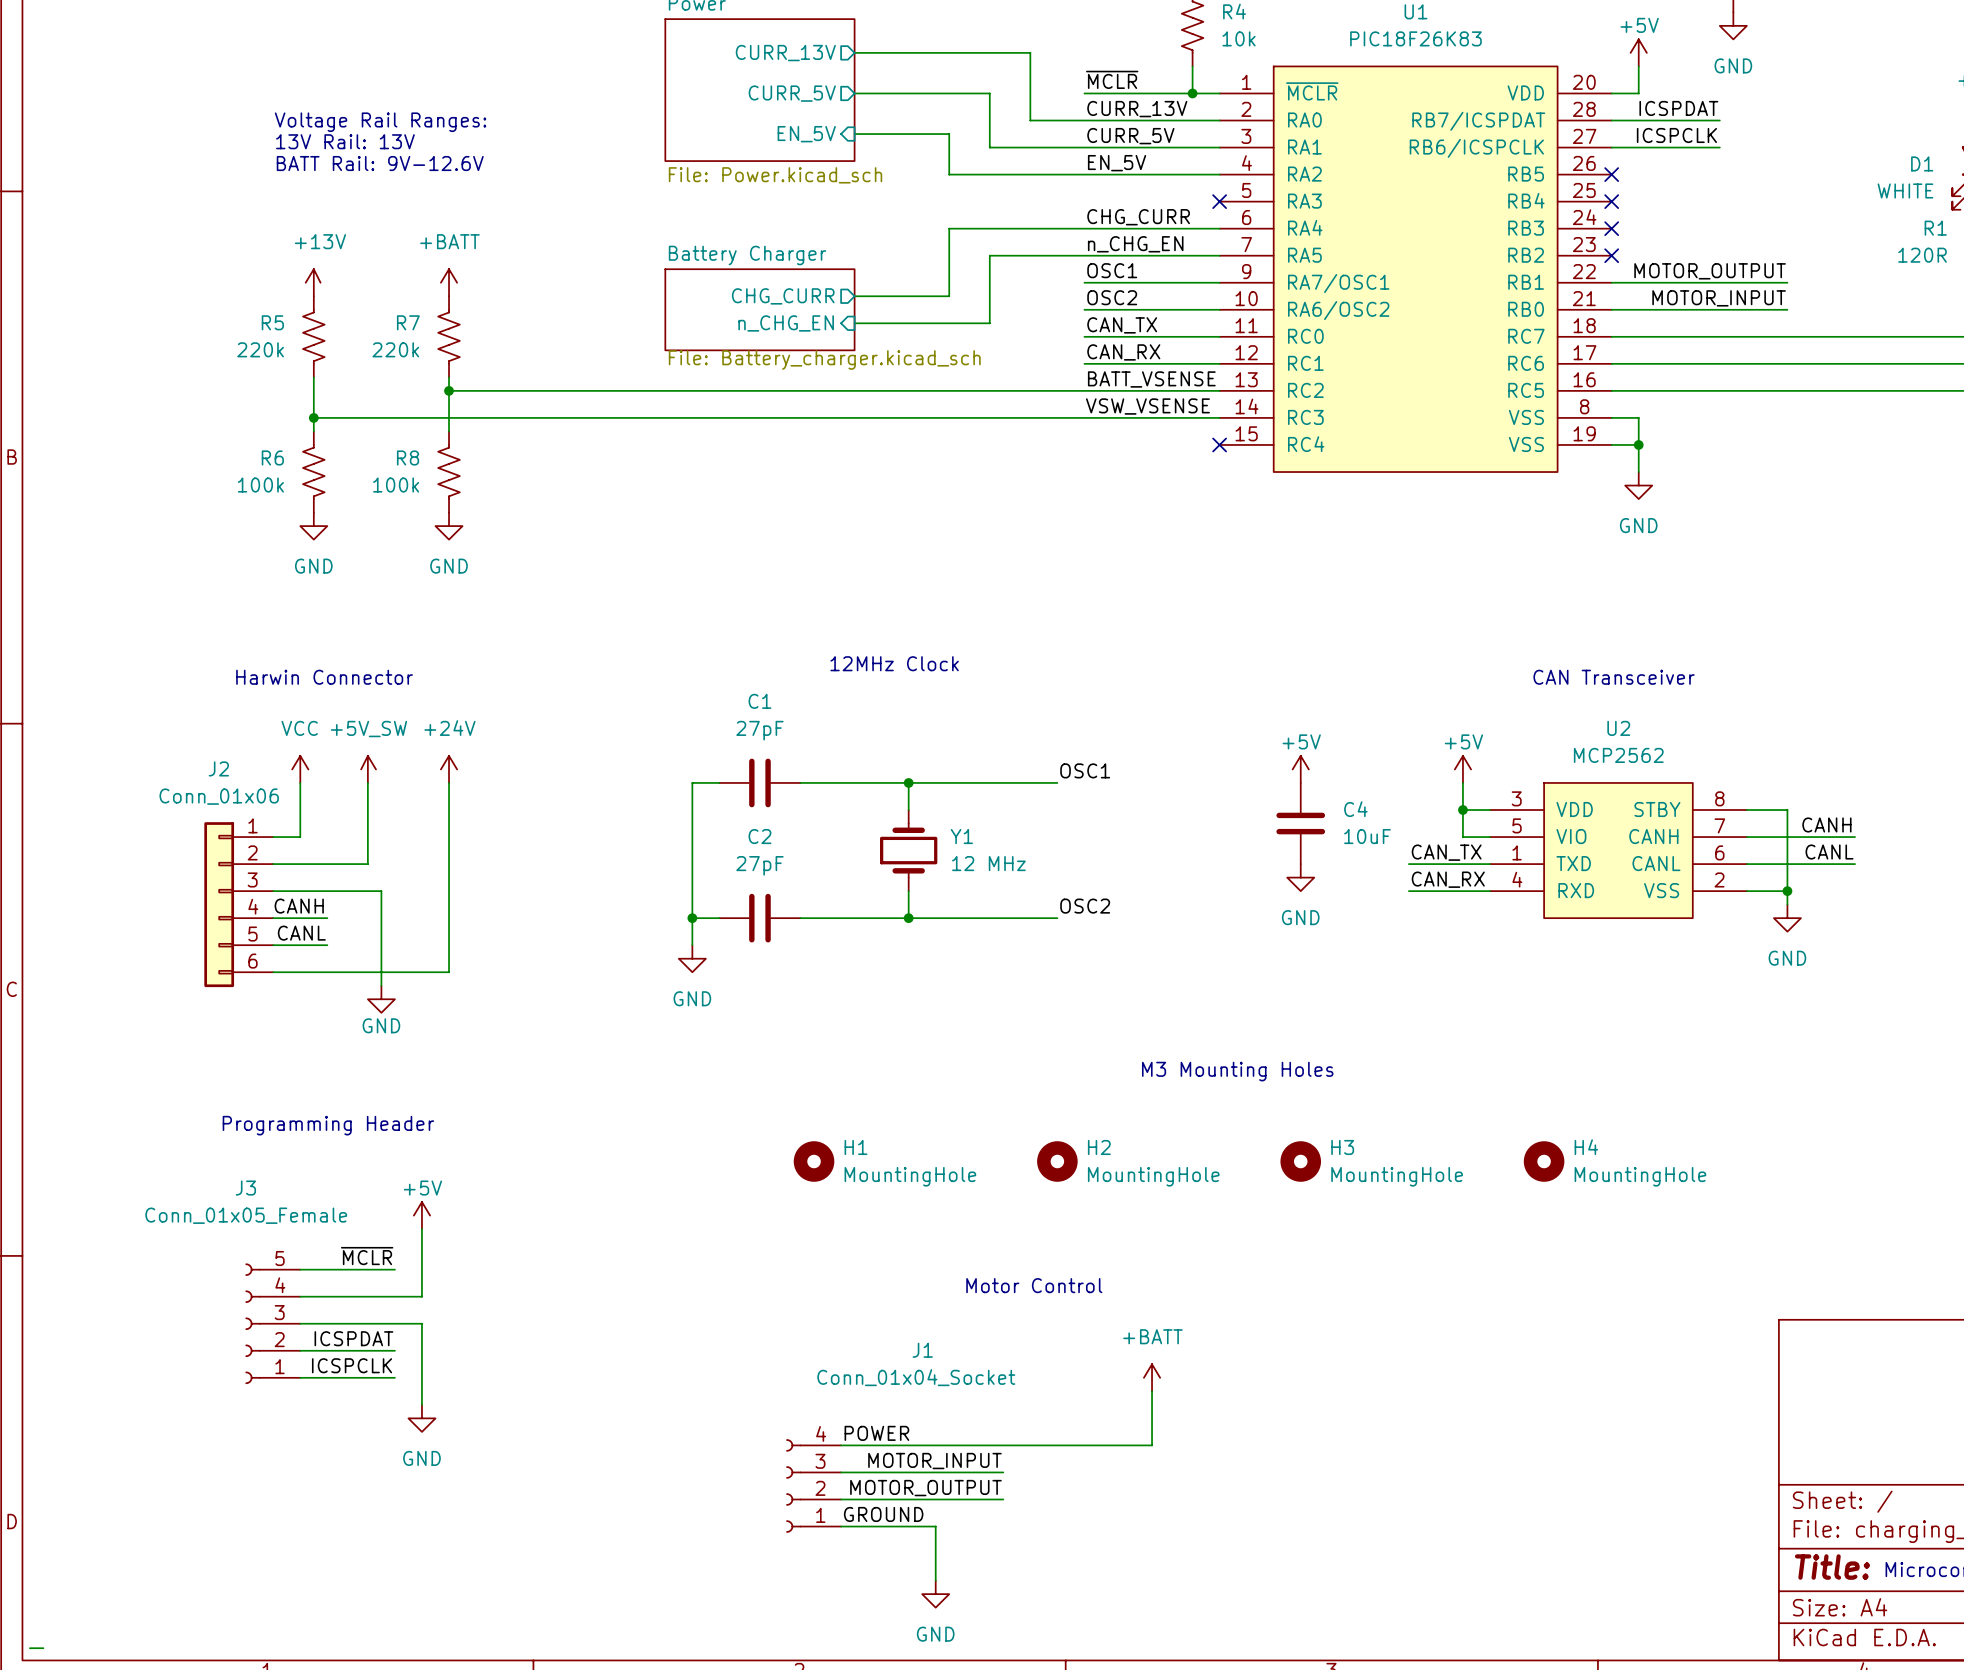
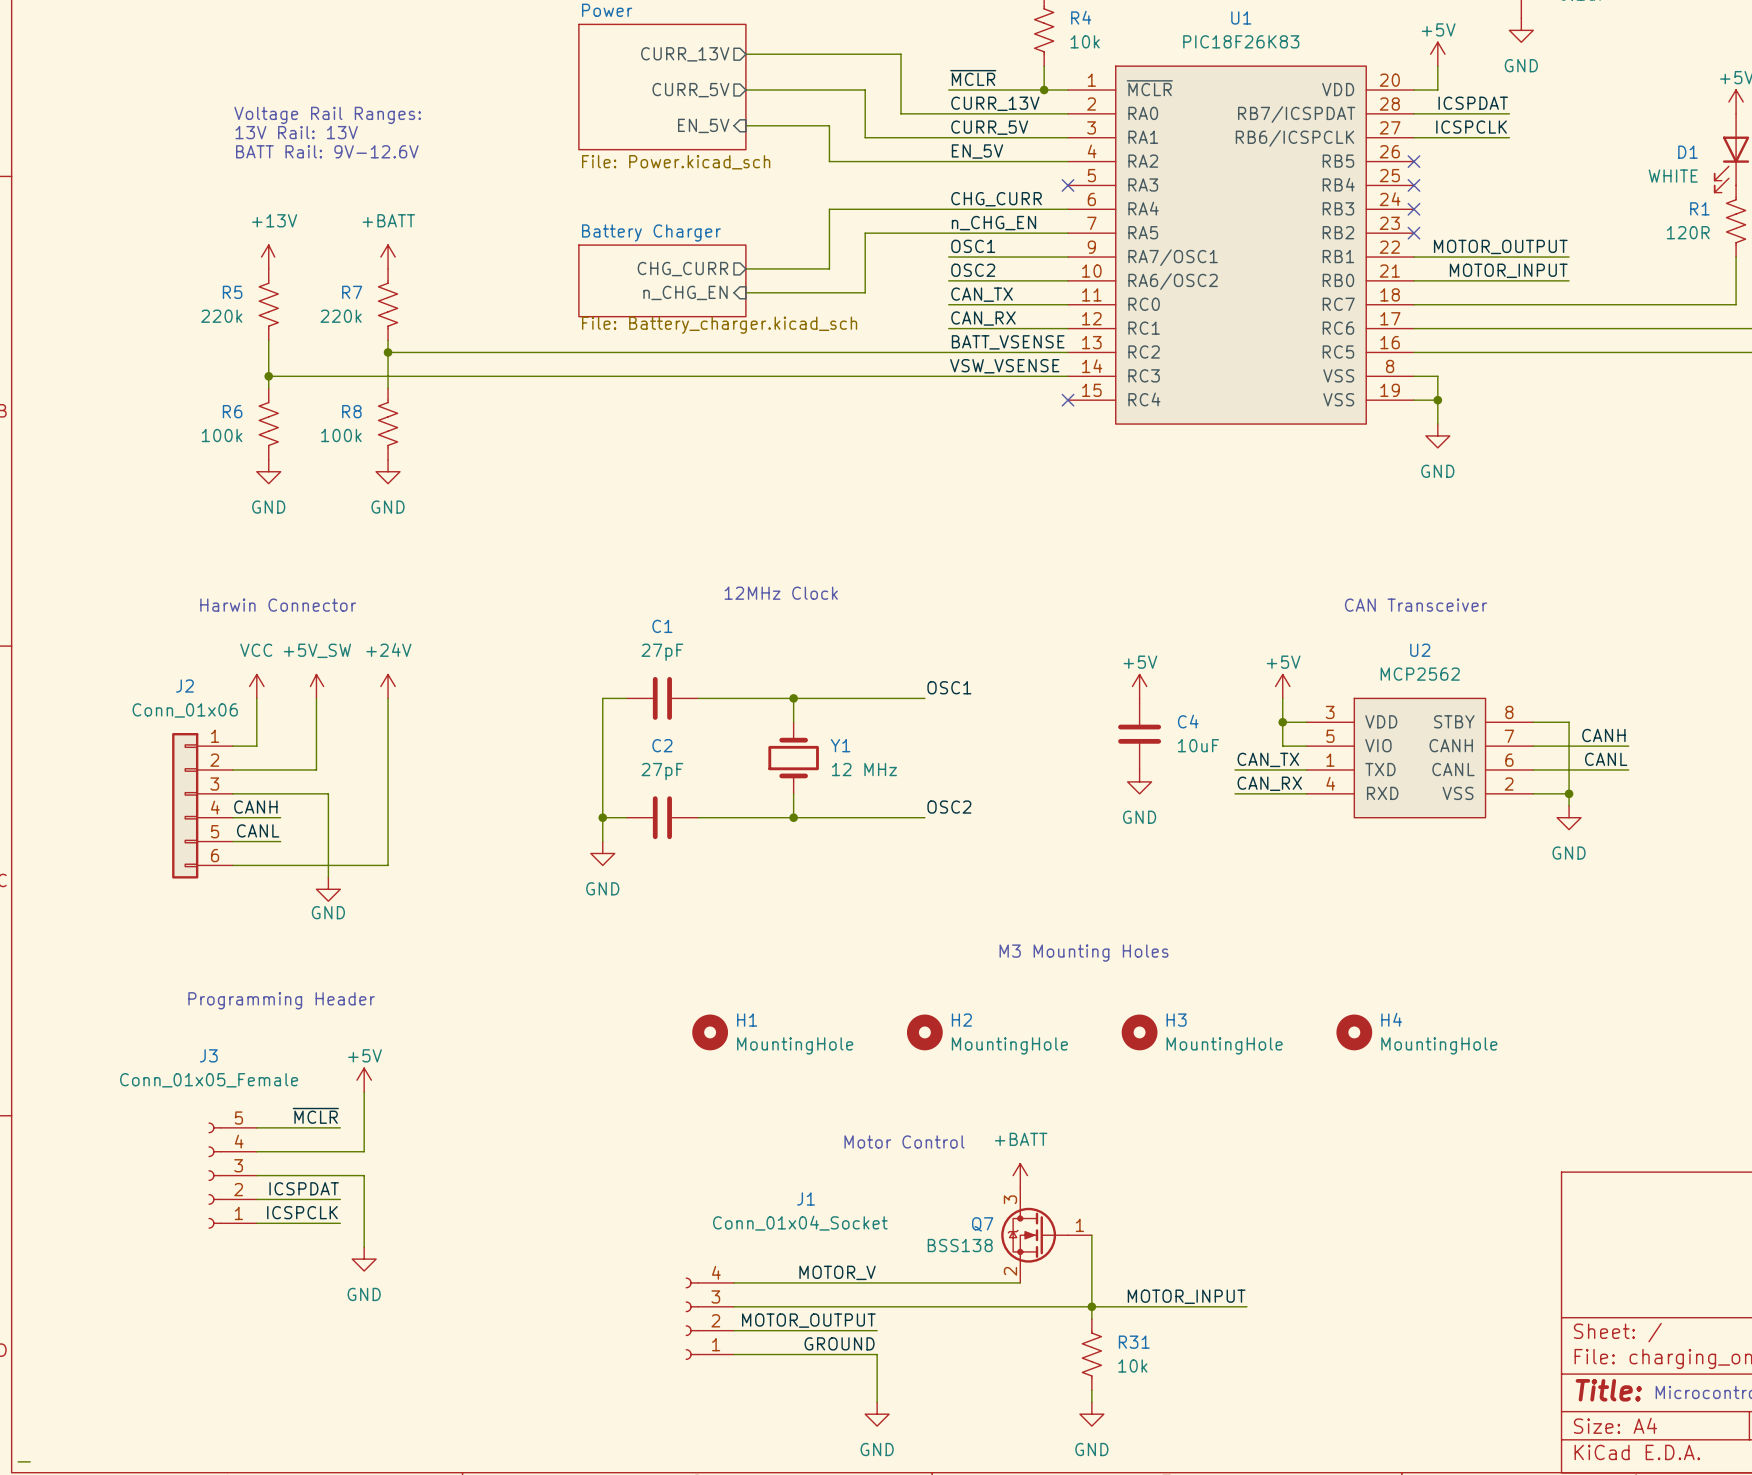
power symbol position: +BATT (1152, 1377) -> +BATT (1020, 1175)
wire: (1152, 1391) (1152, 1445) -> (1020, 1282) (1008, 1282)
Q7: none -> BSS138 (1046, 1235)
wire: none -> (1091, 1235) (1091, 1318)
label: POWER (876, 1433) -> none
label: MOTOR_INPUT (934, 1461) -> MOTOR_V (837, 1272)
label: none -> MOTOR_INPUT (1186, 1296)
wire: none -> (877, 1306) (1246, 1306)
junction: none -> (1091, 1306)
label position: GROUND (883, 1514) -> GROUND (839, 1343)
wire: (935, 1526) (935, 1580) -> (817, 1354) (877, 1354) (877, 1402)
R31: none -> 10k (1091, 1354)
wire: none -> (1091, 1390) (1091, 1402)
power symbol position: GND (935, 1594) -> GND (877, 1414)
power symbol: none -> GND (1091, 1414)

